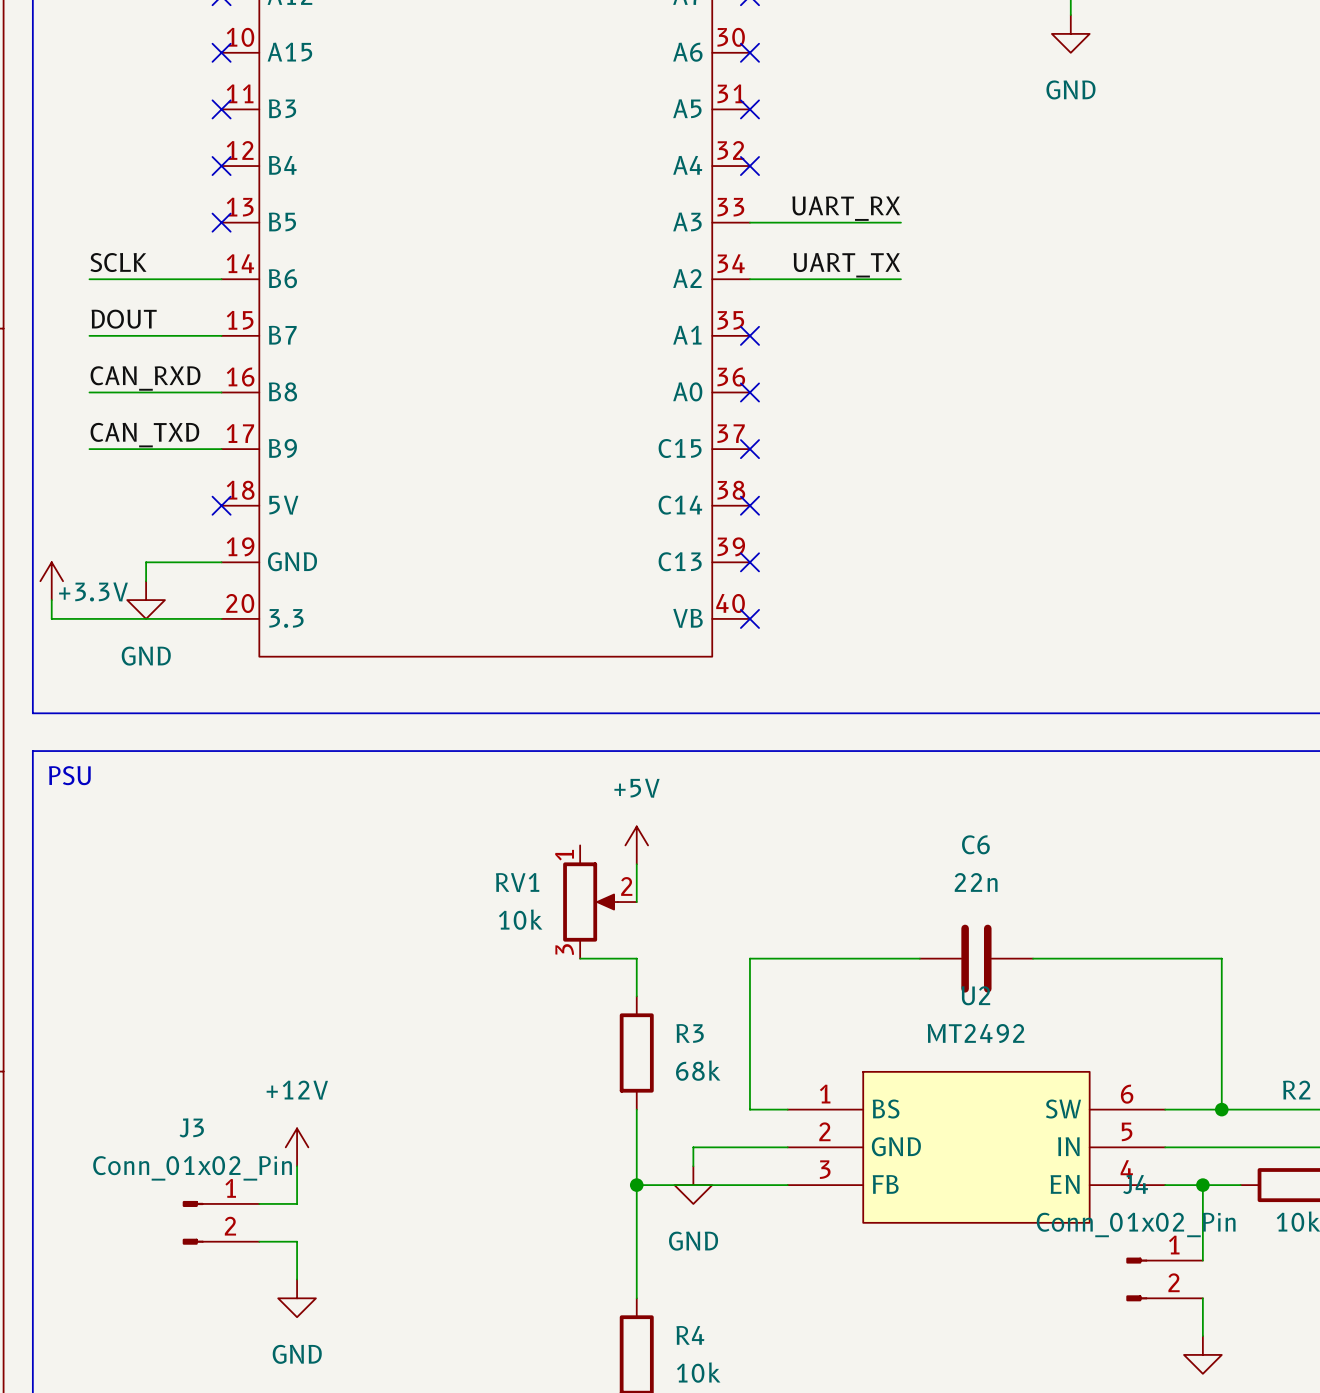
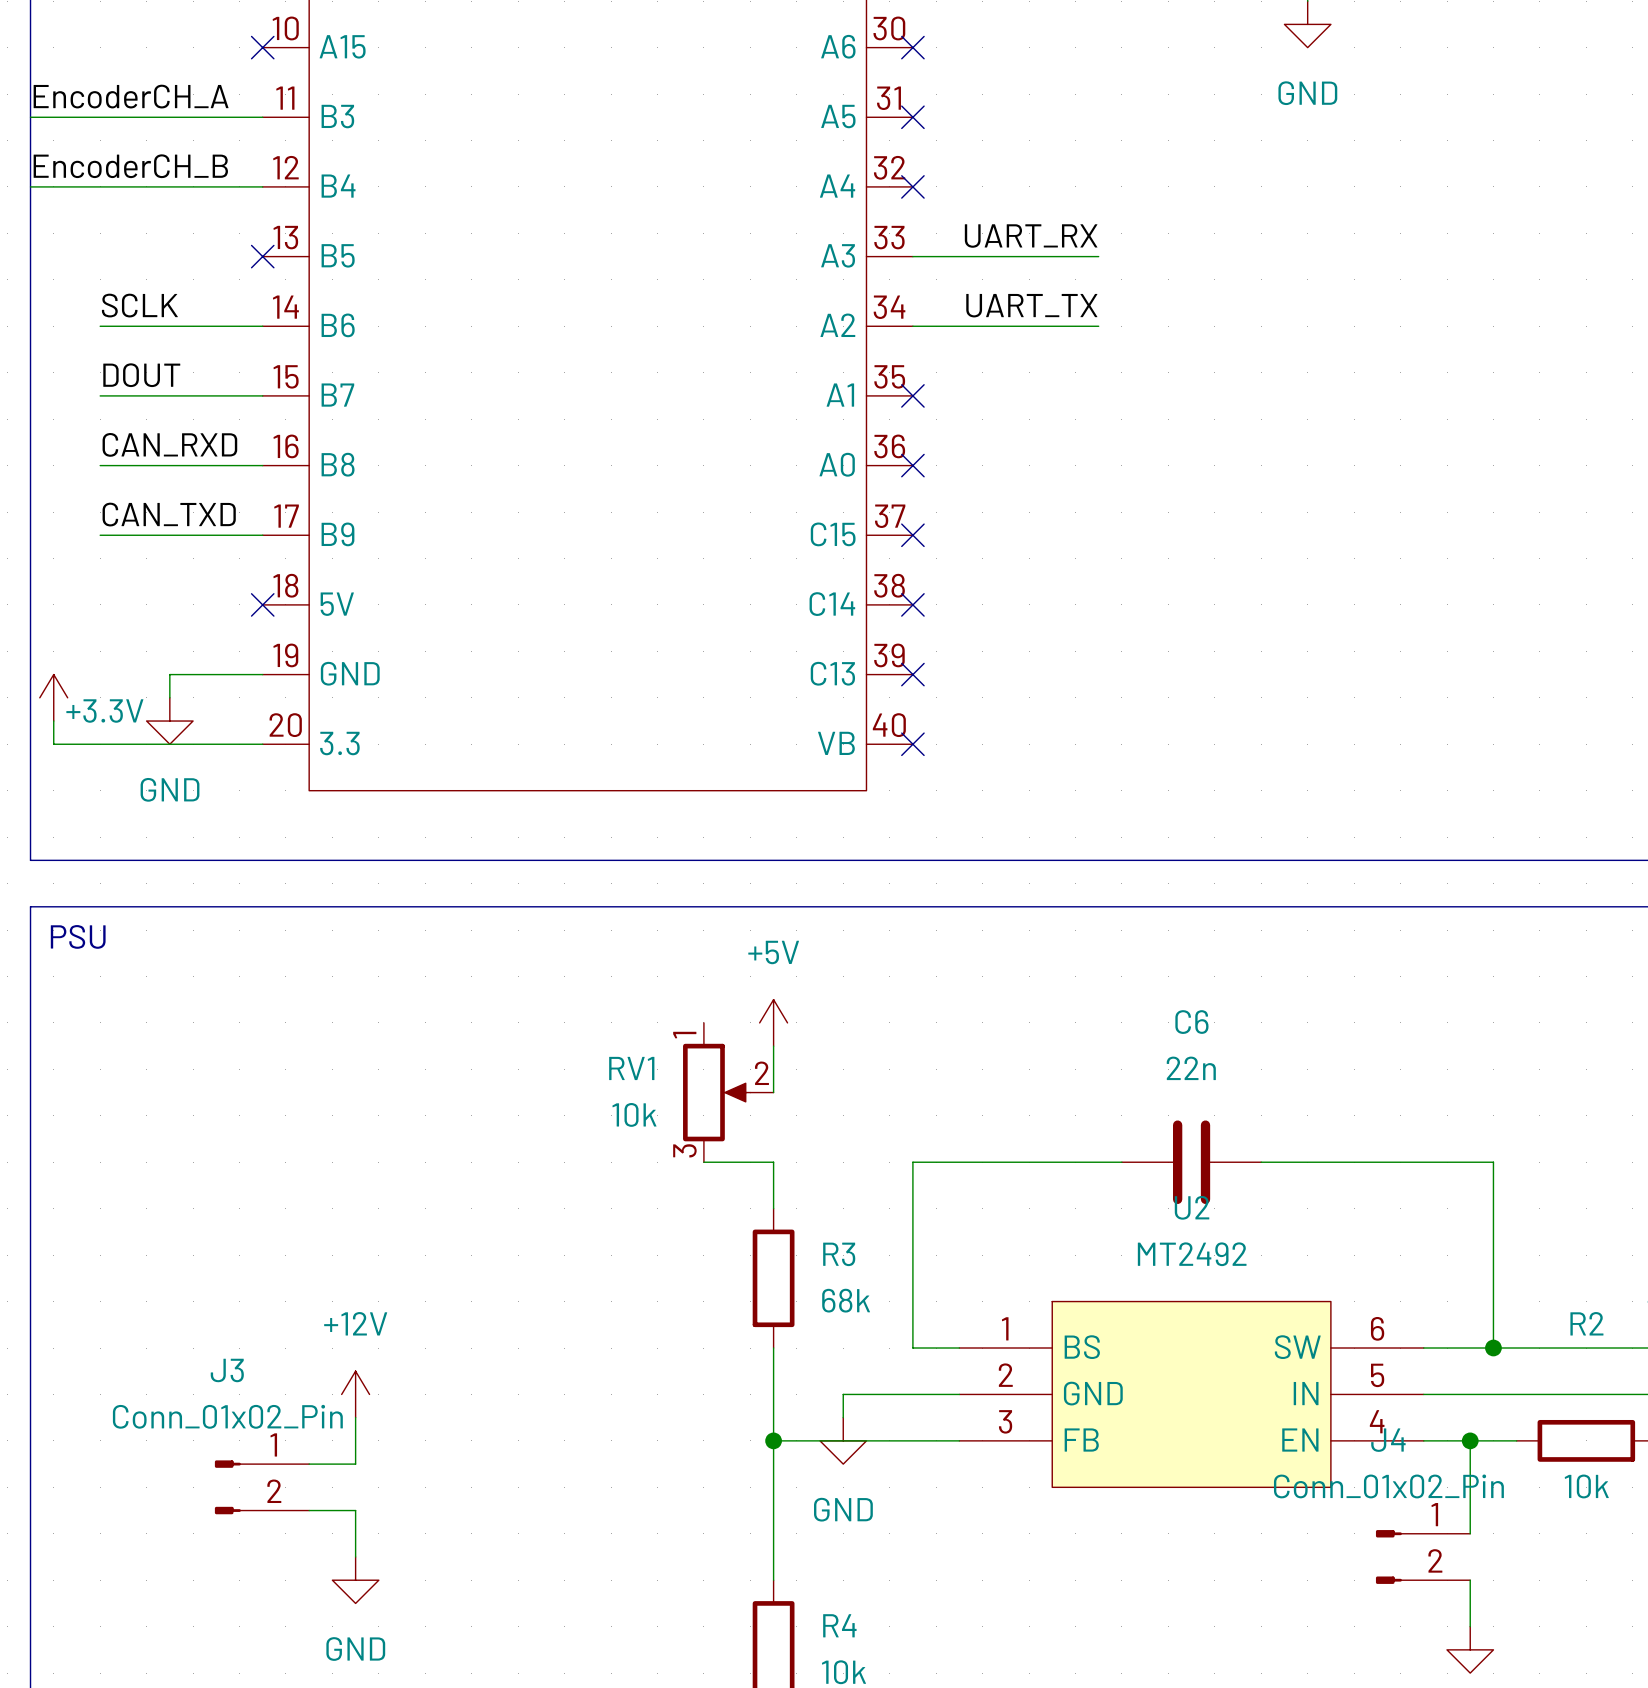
label: none -> EncoderCH_A (131, 96)
wire: none -> (30, 117) (262, 117)
no-connect mark: (221, 109) -> none
label: none -> EncoderCH_B (130, 166)
wire: none -> (30, 186) (262, 186)
no-connect mark: (221, 166) -> none

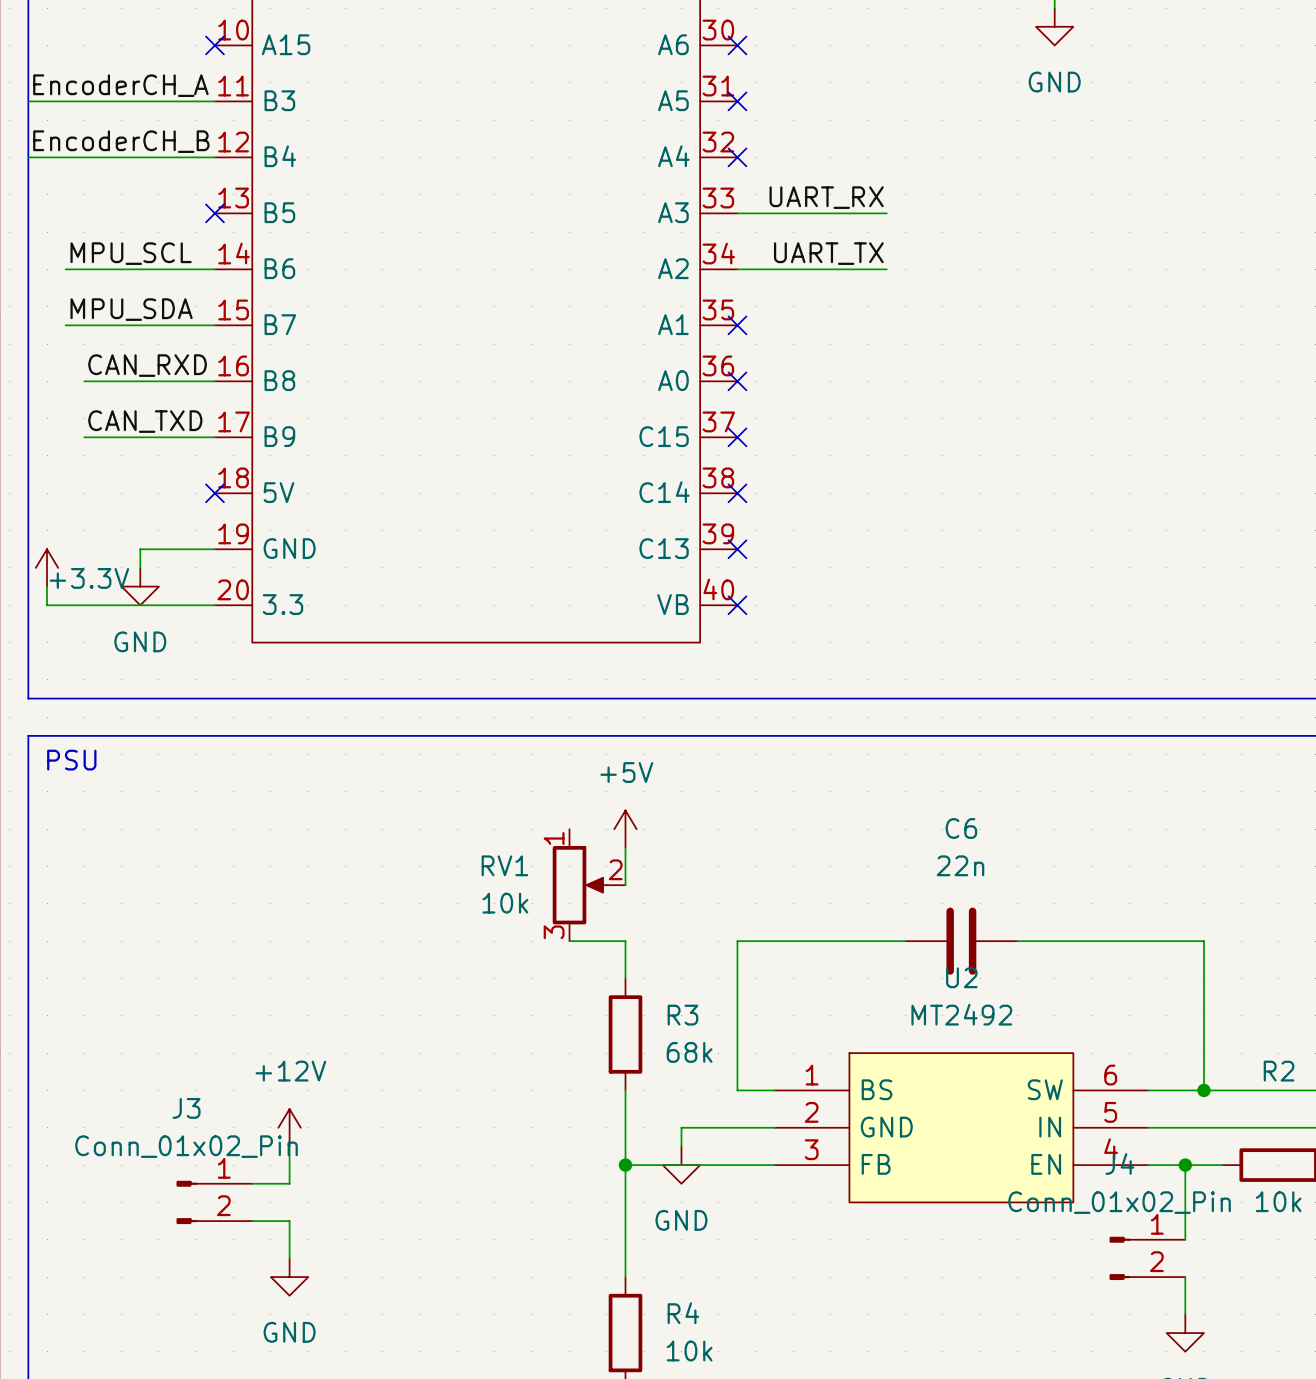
label: SCLK (139, 305) -> none
label: none -> MPU_SCL (131, 253)
wire: none -> (65, 269) (84, 269)
label: DOUT (141, 375) -> none
label: none -> MPU_SDA (131, 309)
wire: none -> (65, 325) (84, 325)

